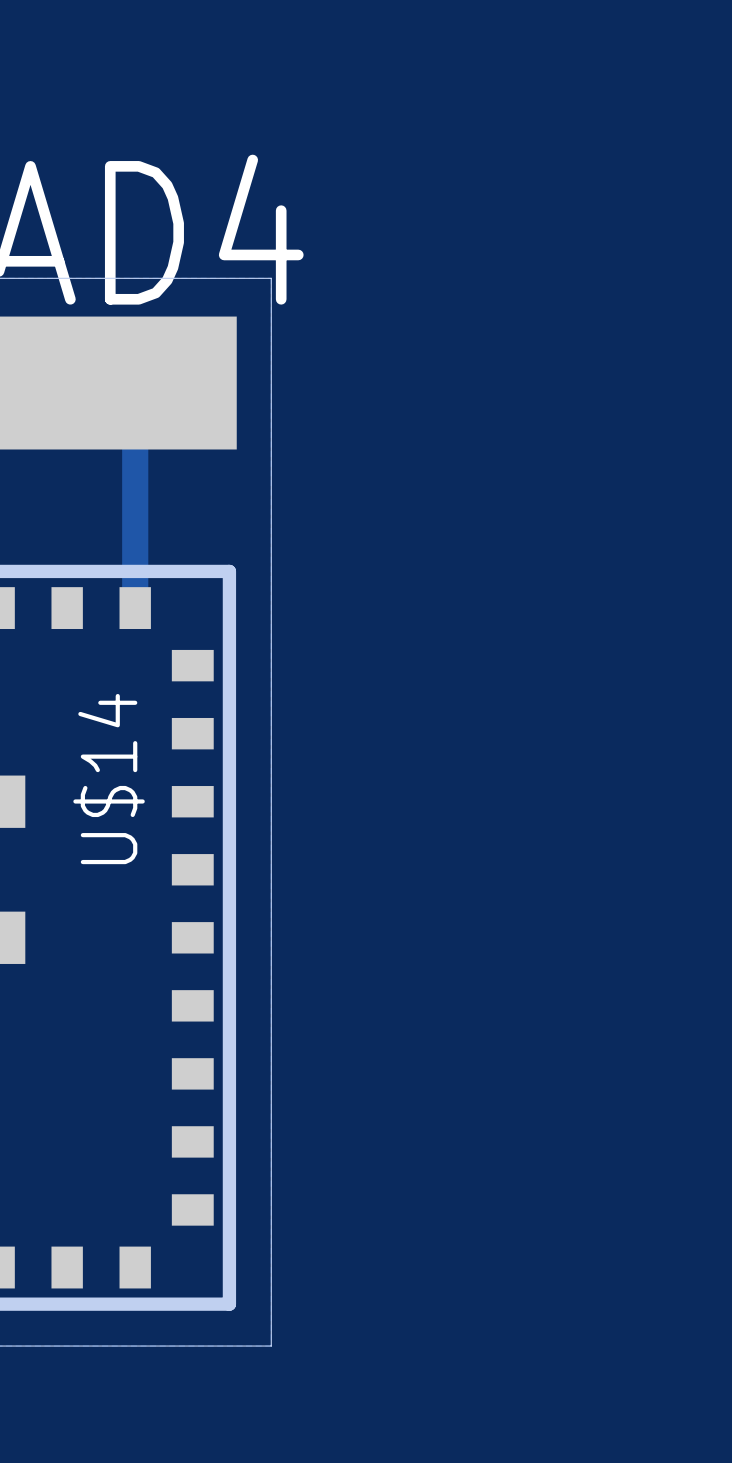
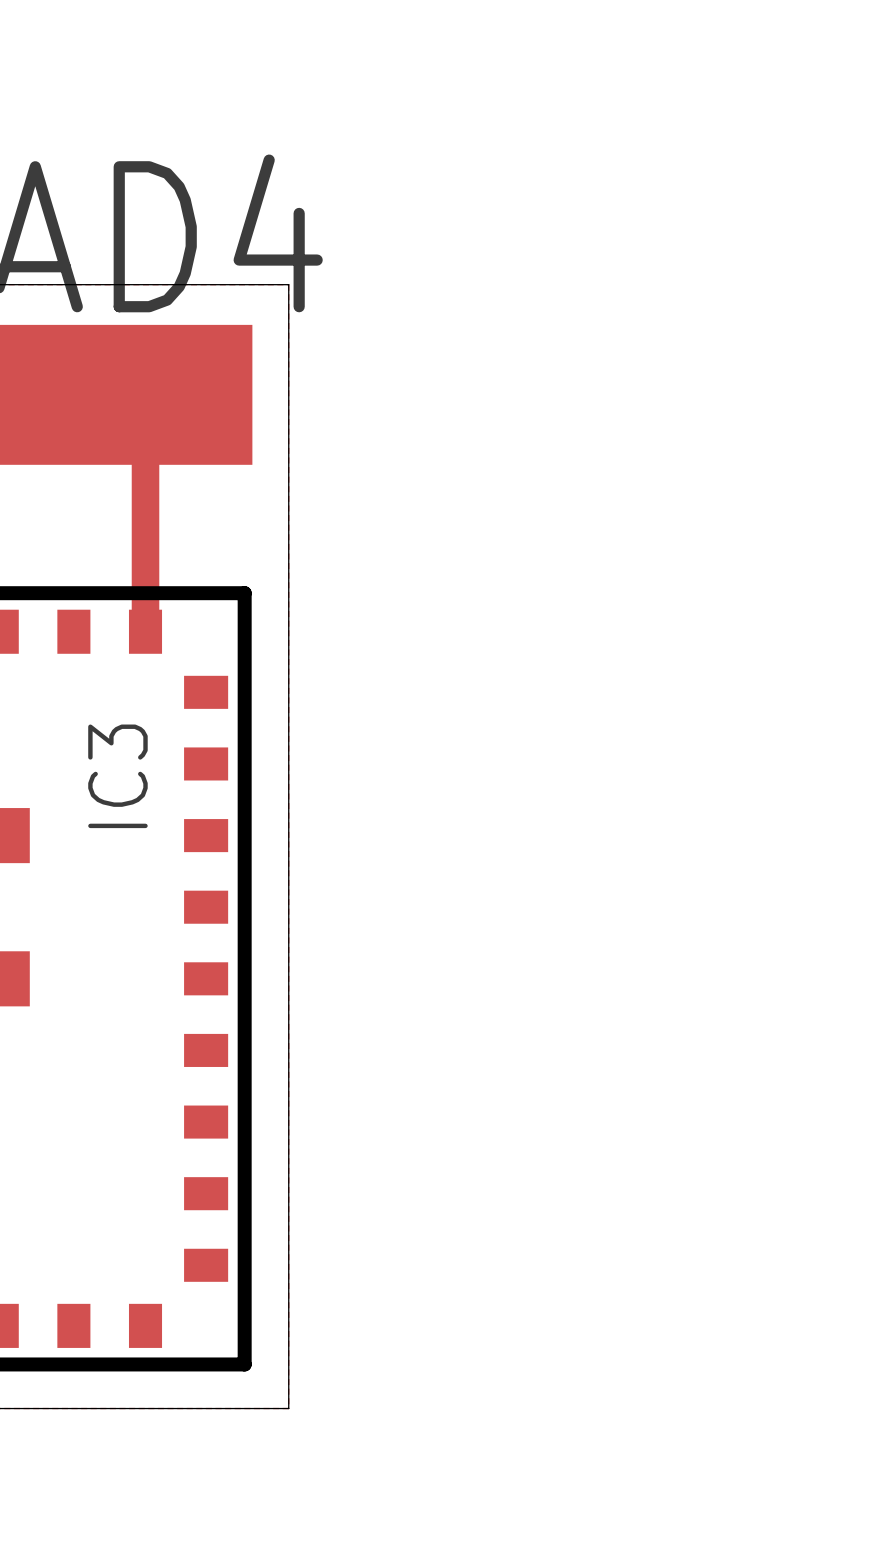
U$14 name: U$14 (109, 779) -> IC3 (117, 776)

